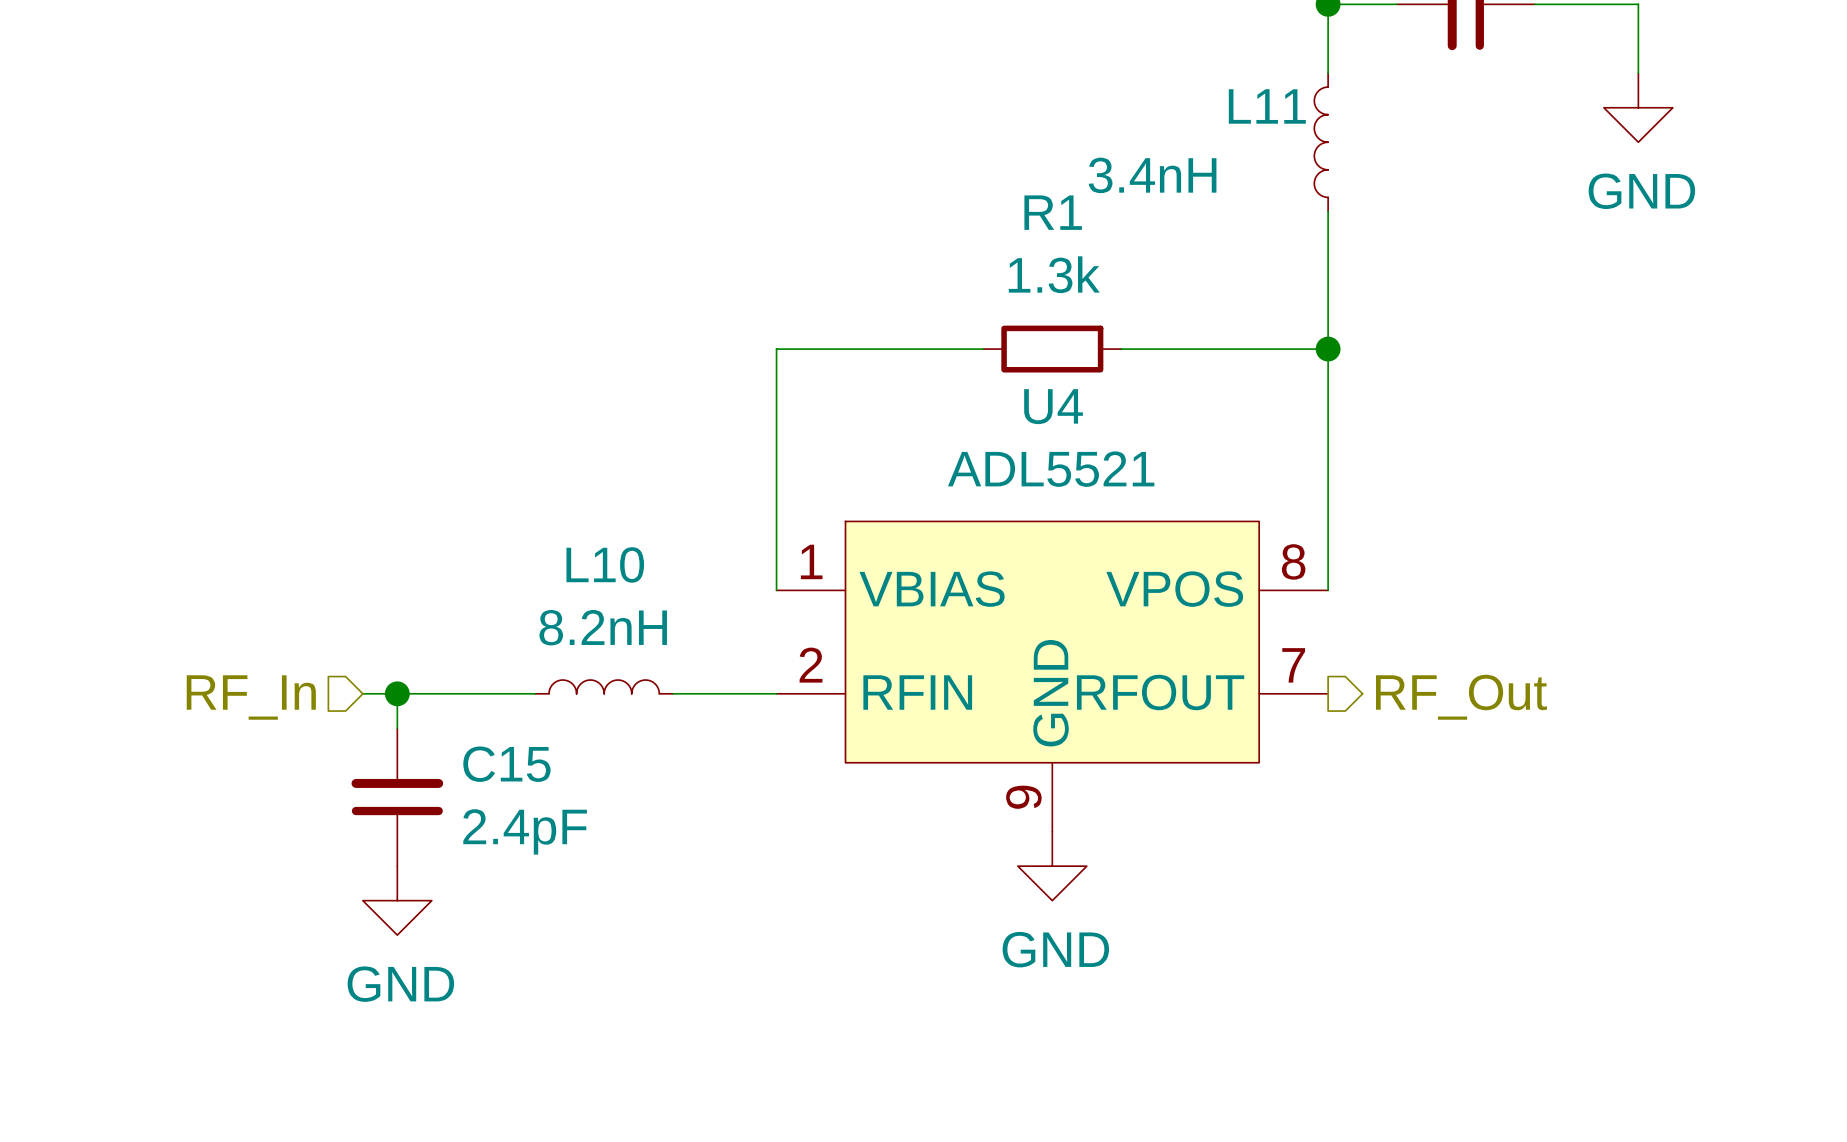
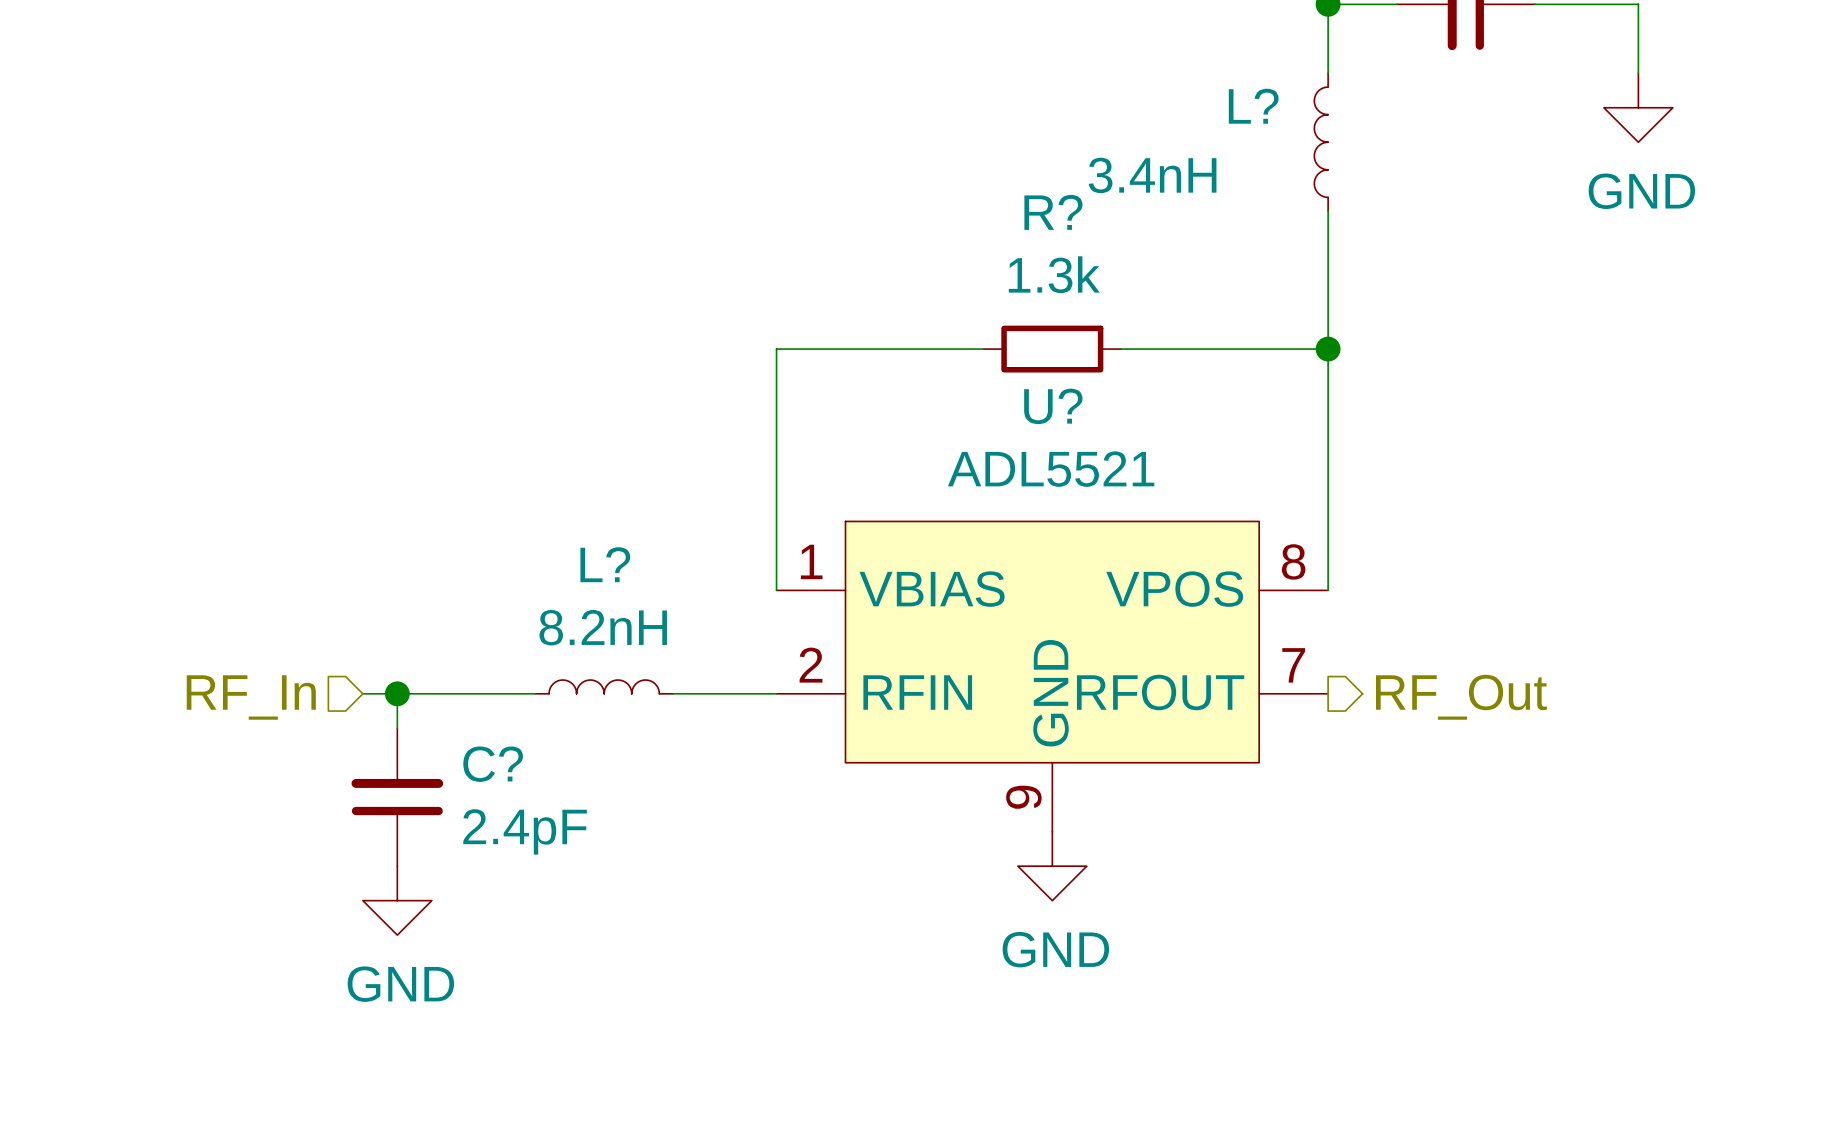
L11 name: L11 (1267, 106) -> L? (1253, 106)
R1 name: R1 (1053, 212) -> R? (1053, 212)
U4 name: U4 (1053, 406) -> U? (1053, 406)
L10 name: L10 (605, 564) -> L? (605, 564)
C15 name: C15 (506, 764) -> C? (493, 764)

